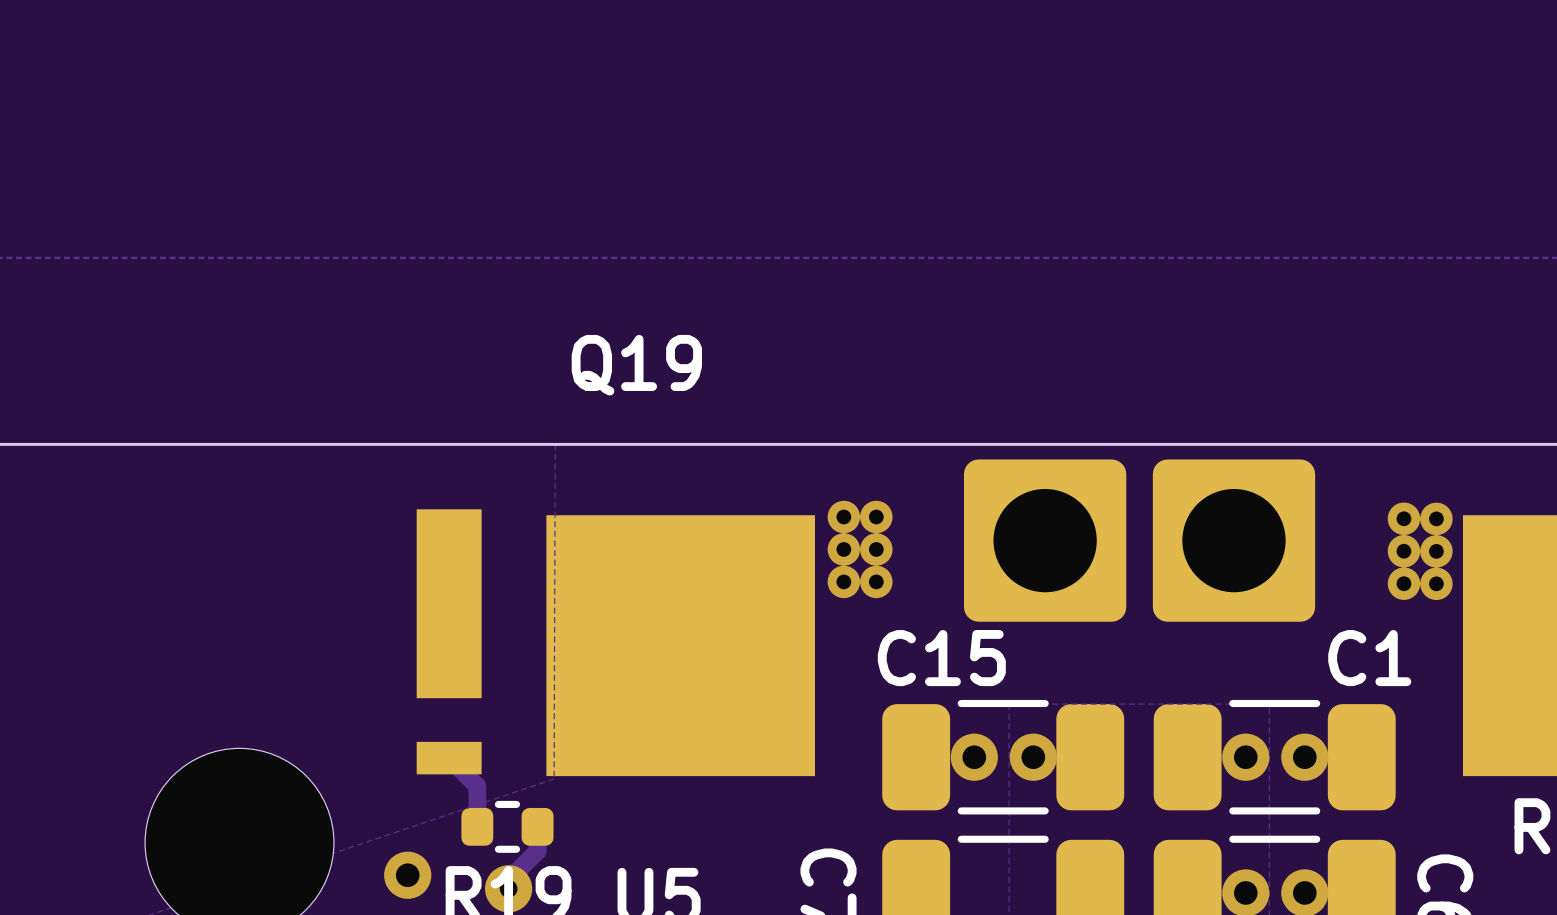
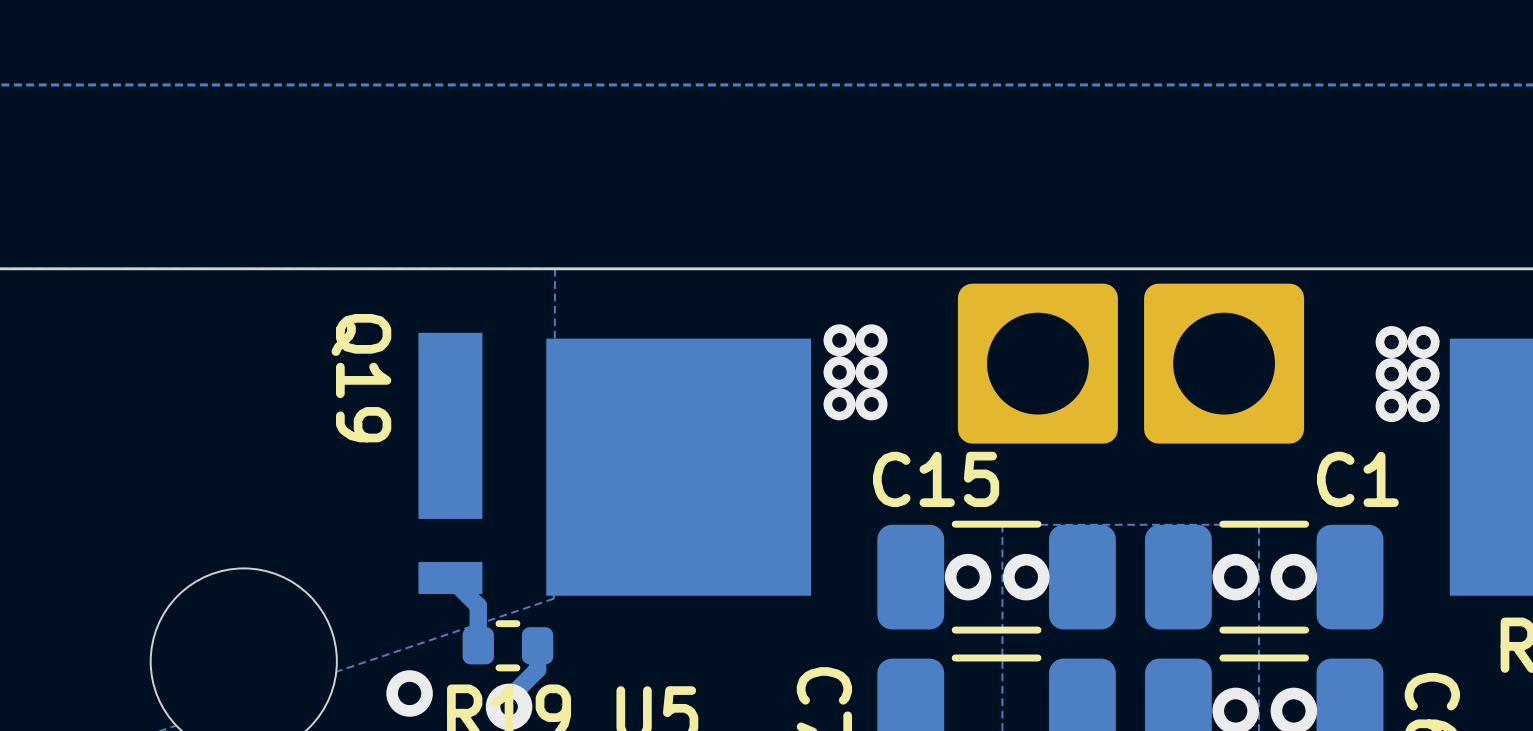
Q19 name rotation: 0° (636, 365) -> 90° clockwise (361, 378)
Q19 name position: Q19 (636, 365) -> Q19 (361, 378)

